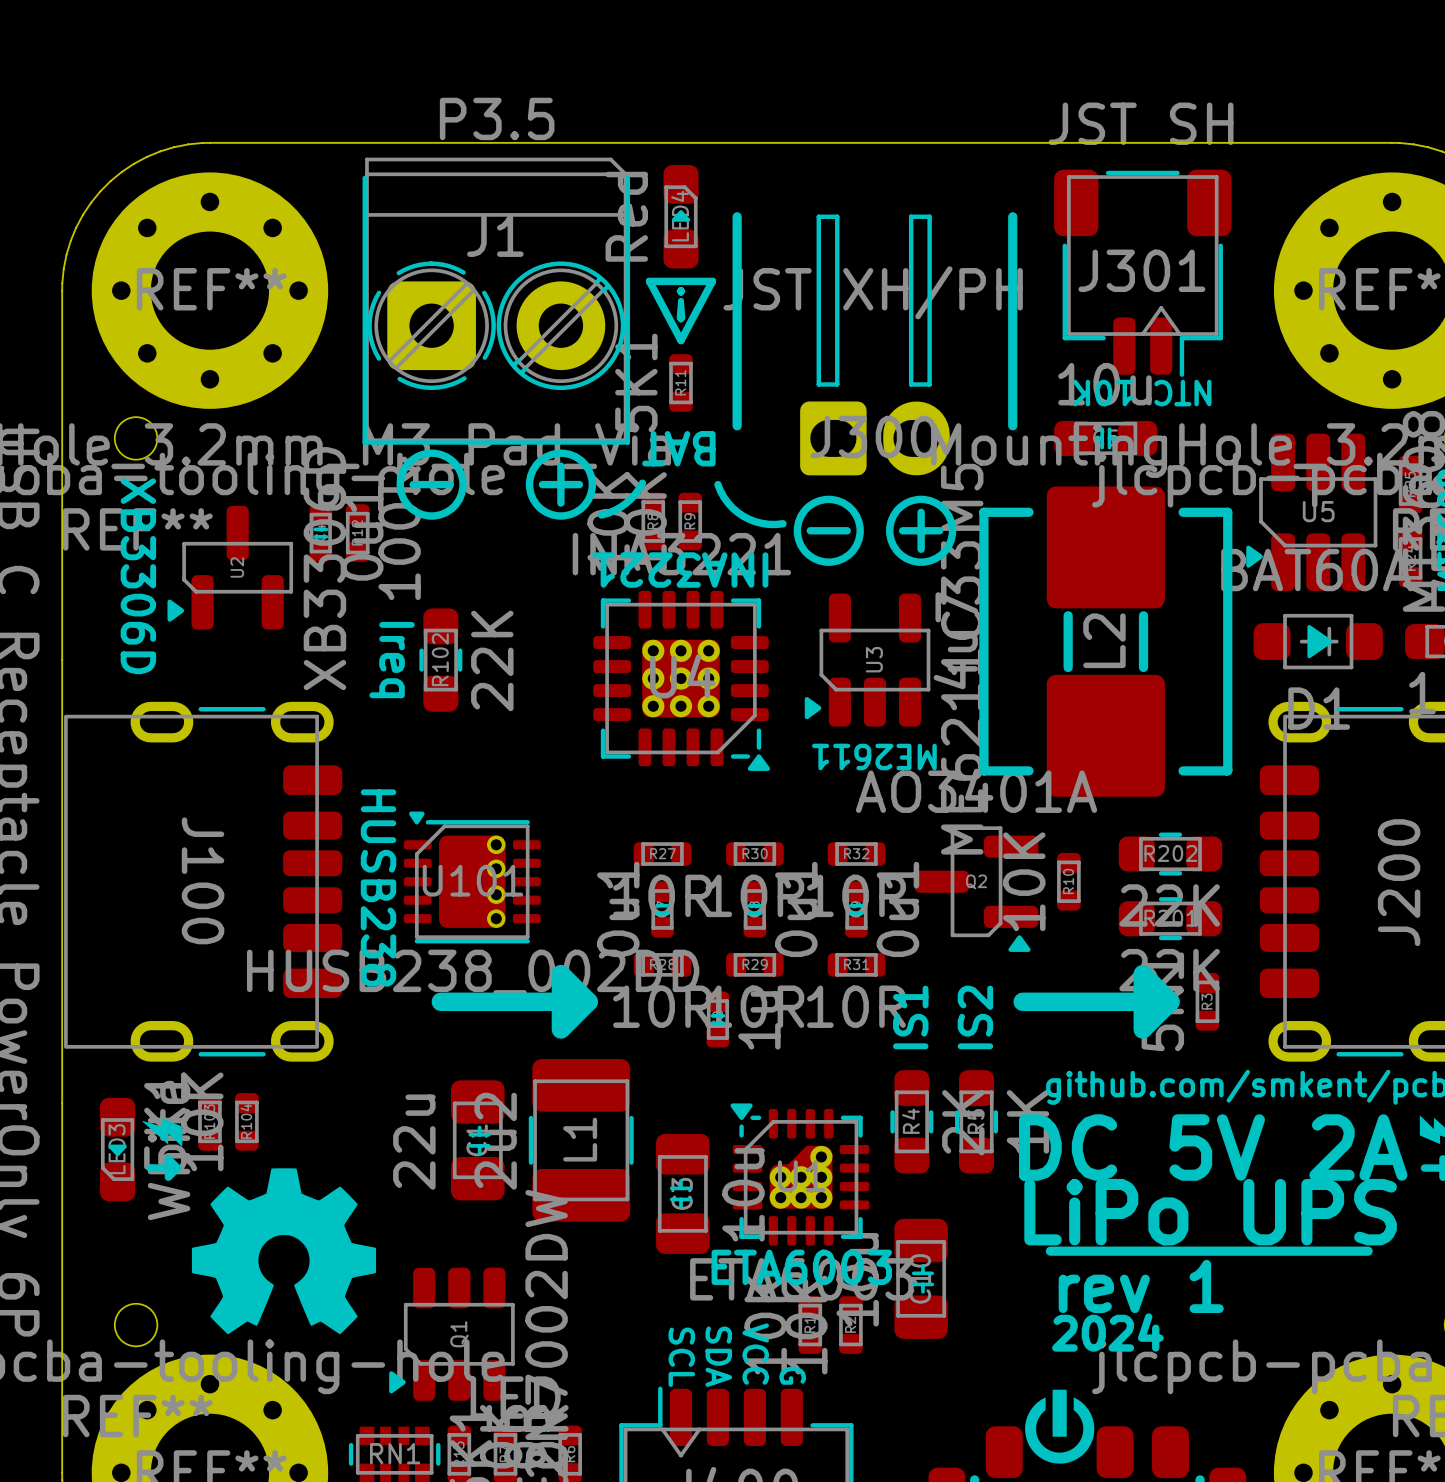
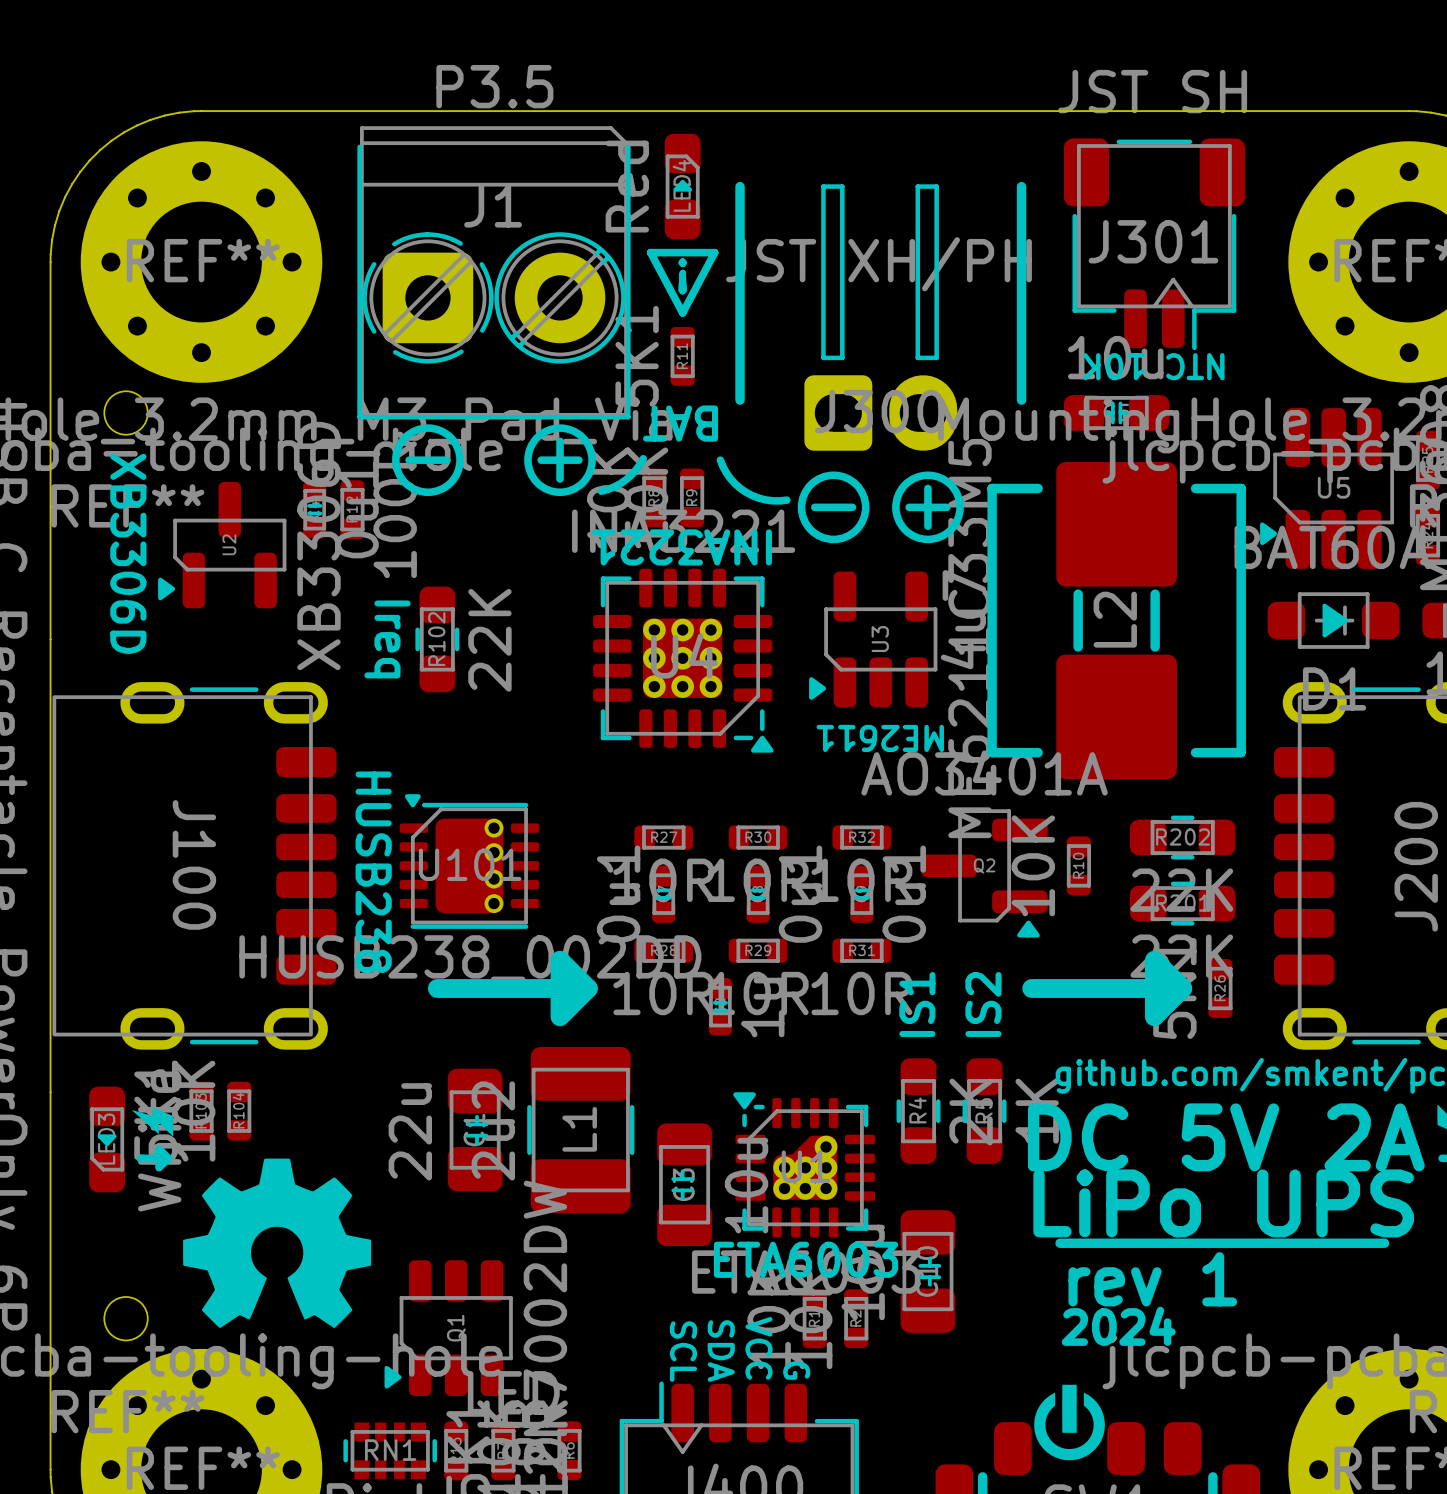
R3 name: R3 (1207, 1001) -> R26 (1220, 988)

